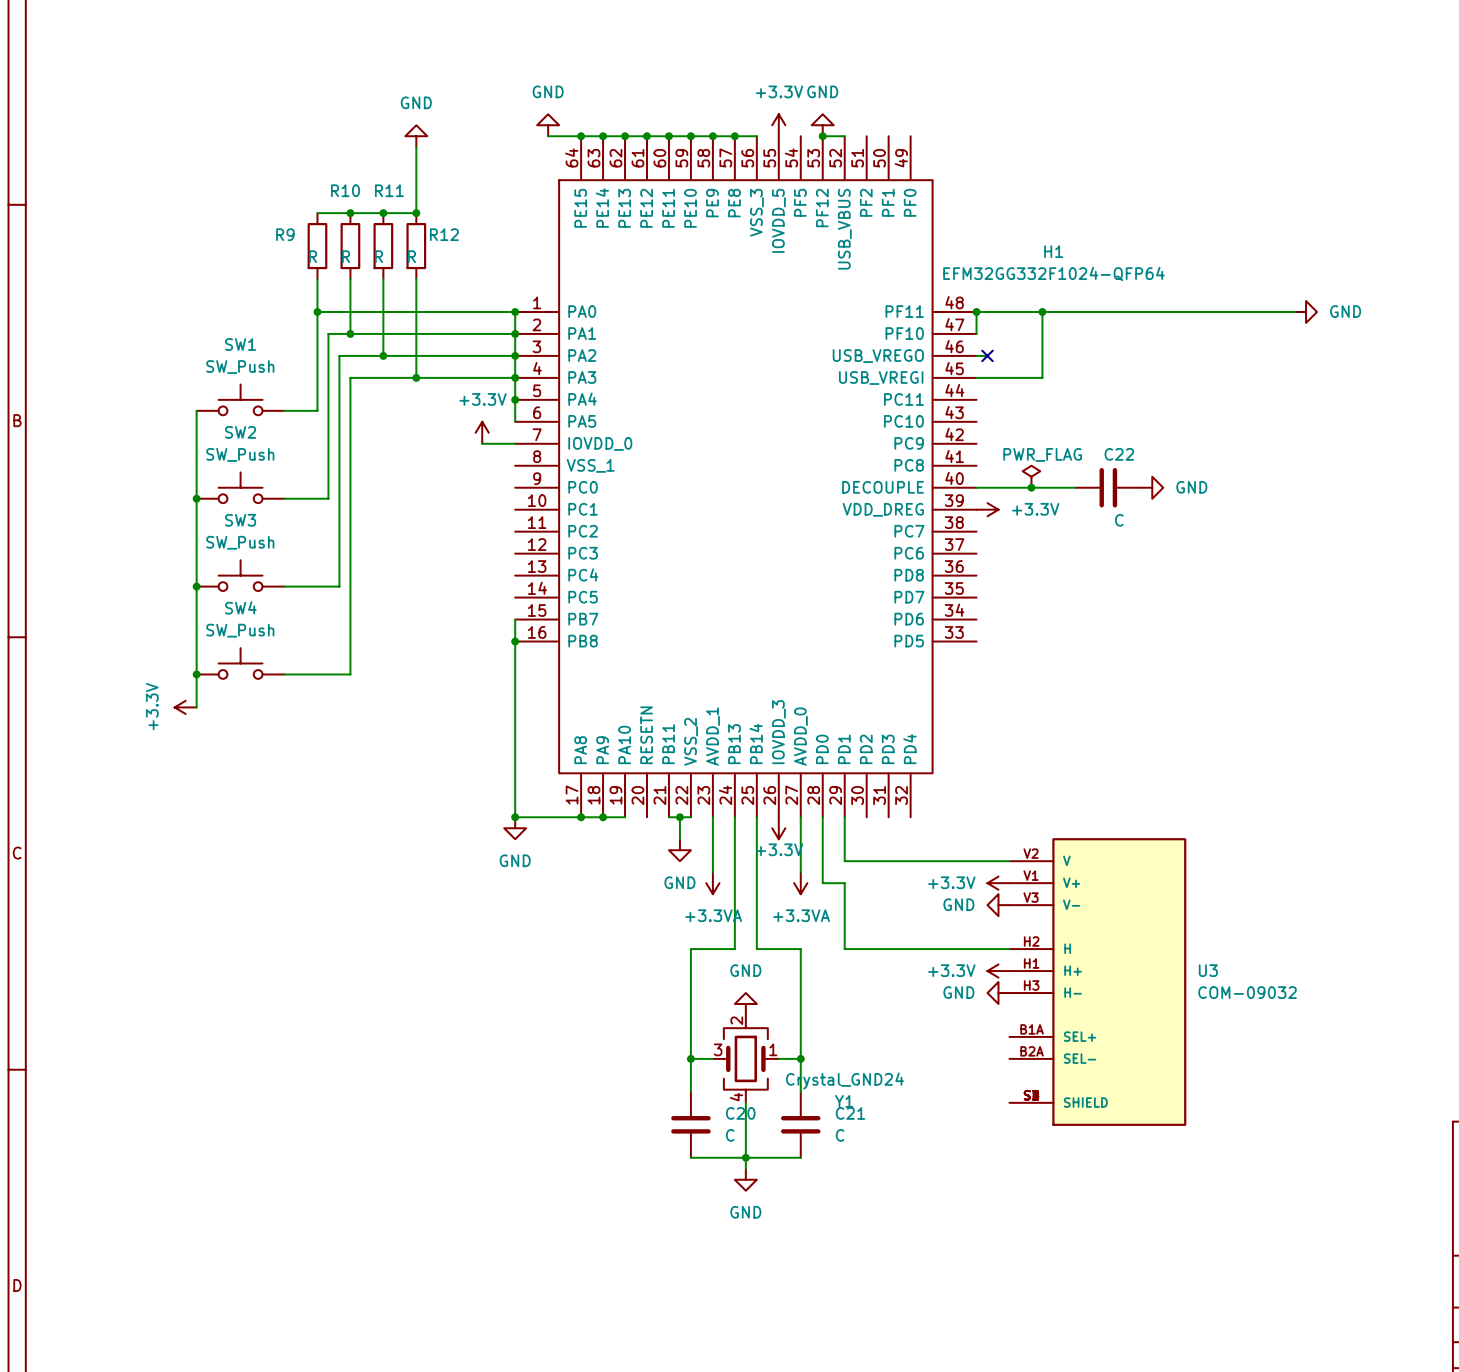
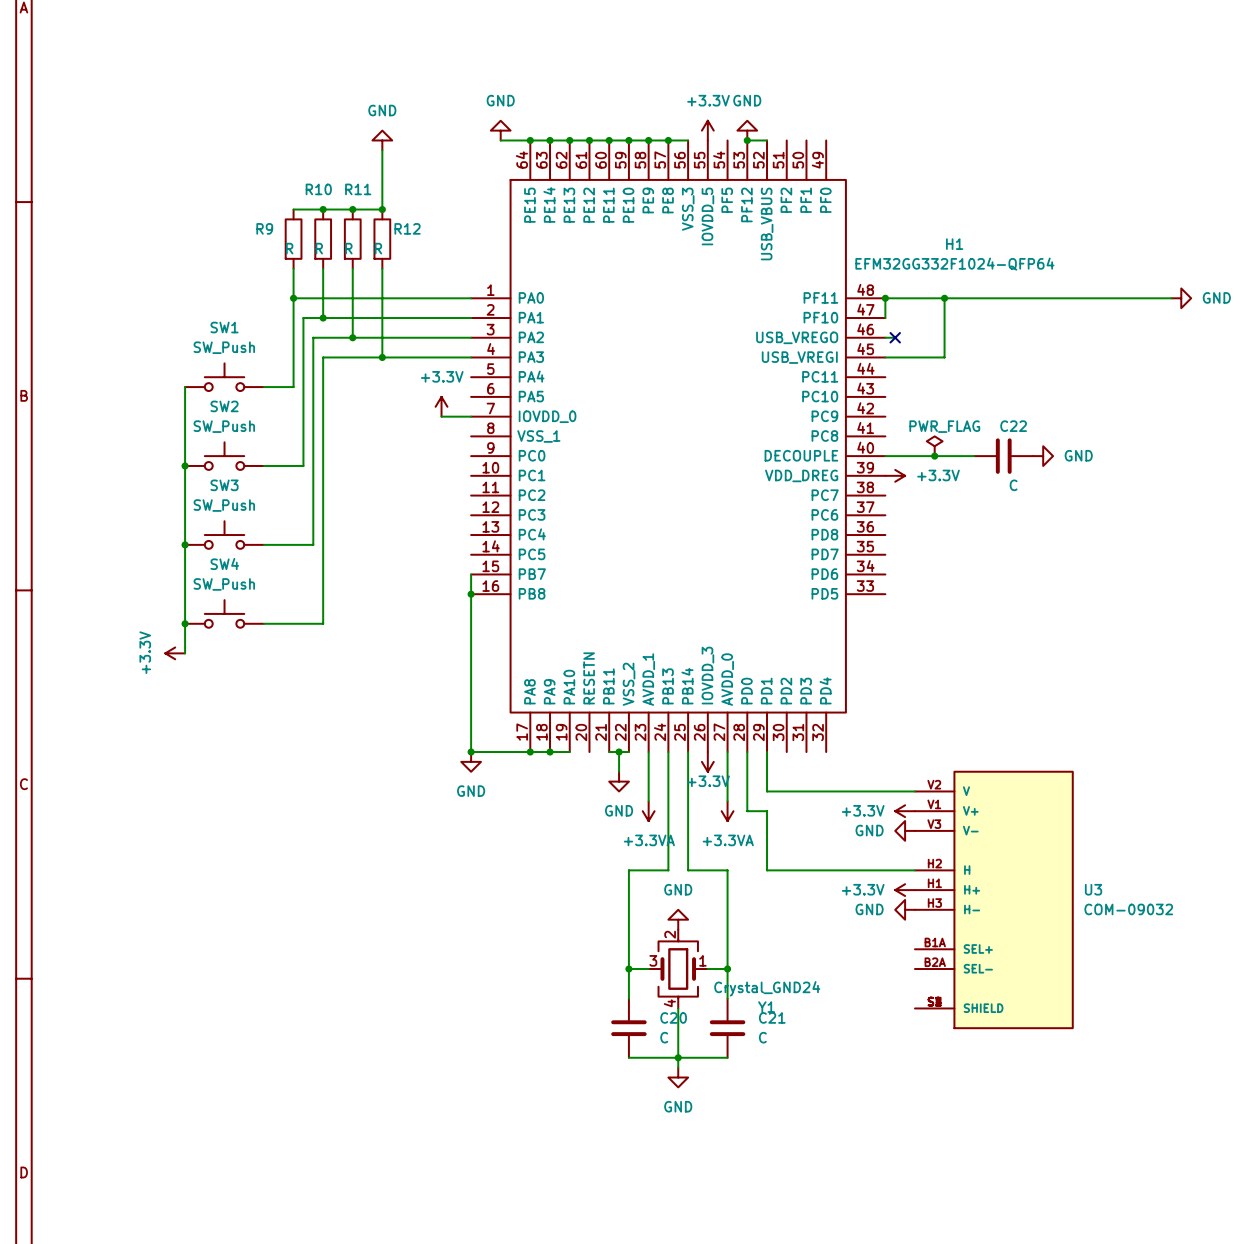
wire: (515, 311) (515, 421) -> none
junction: (515, 311) -> none
junction: (515, 333) -> none
junction: (515, 355) -> none
junction: (515, 377) -> none
junction: (515, 399) -> none

